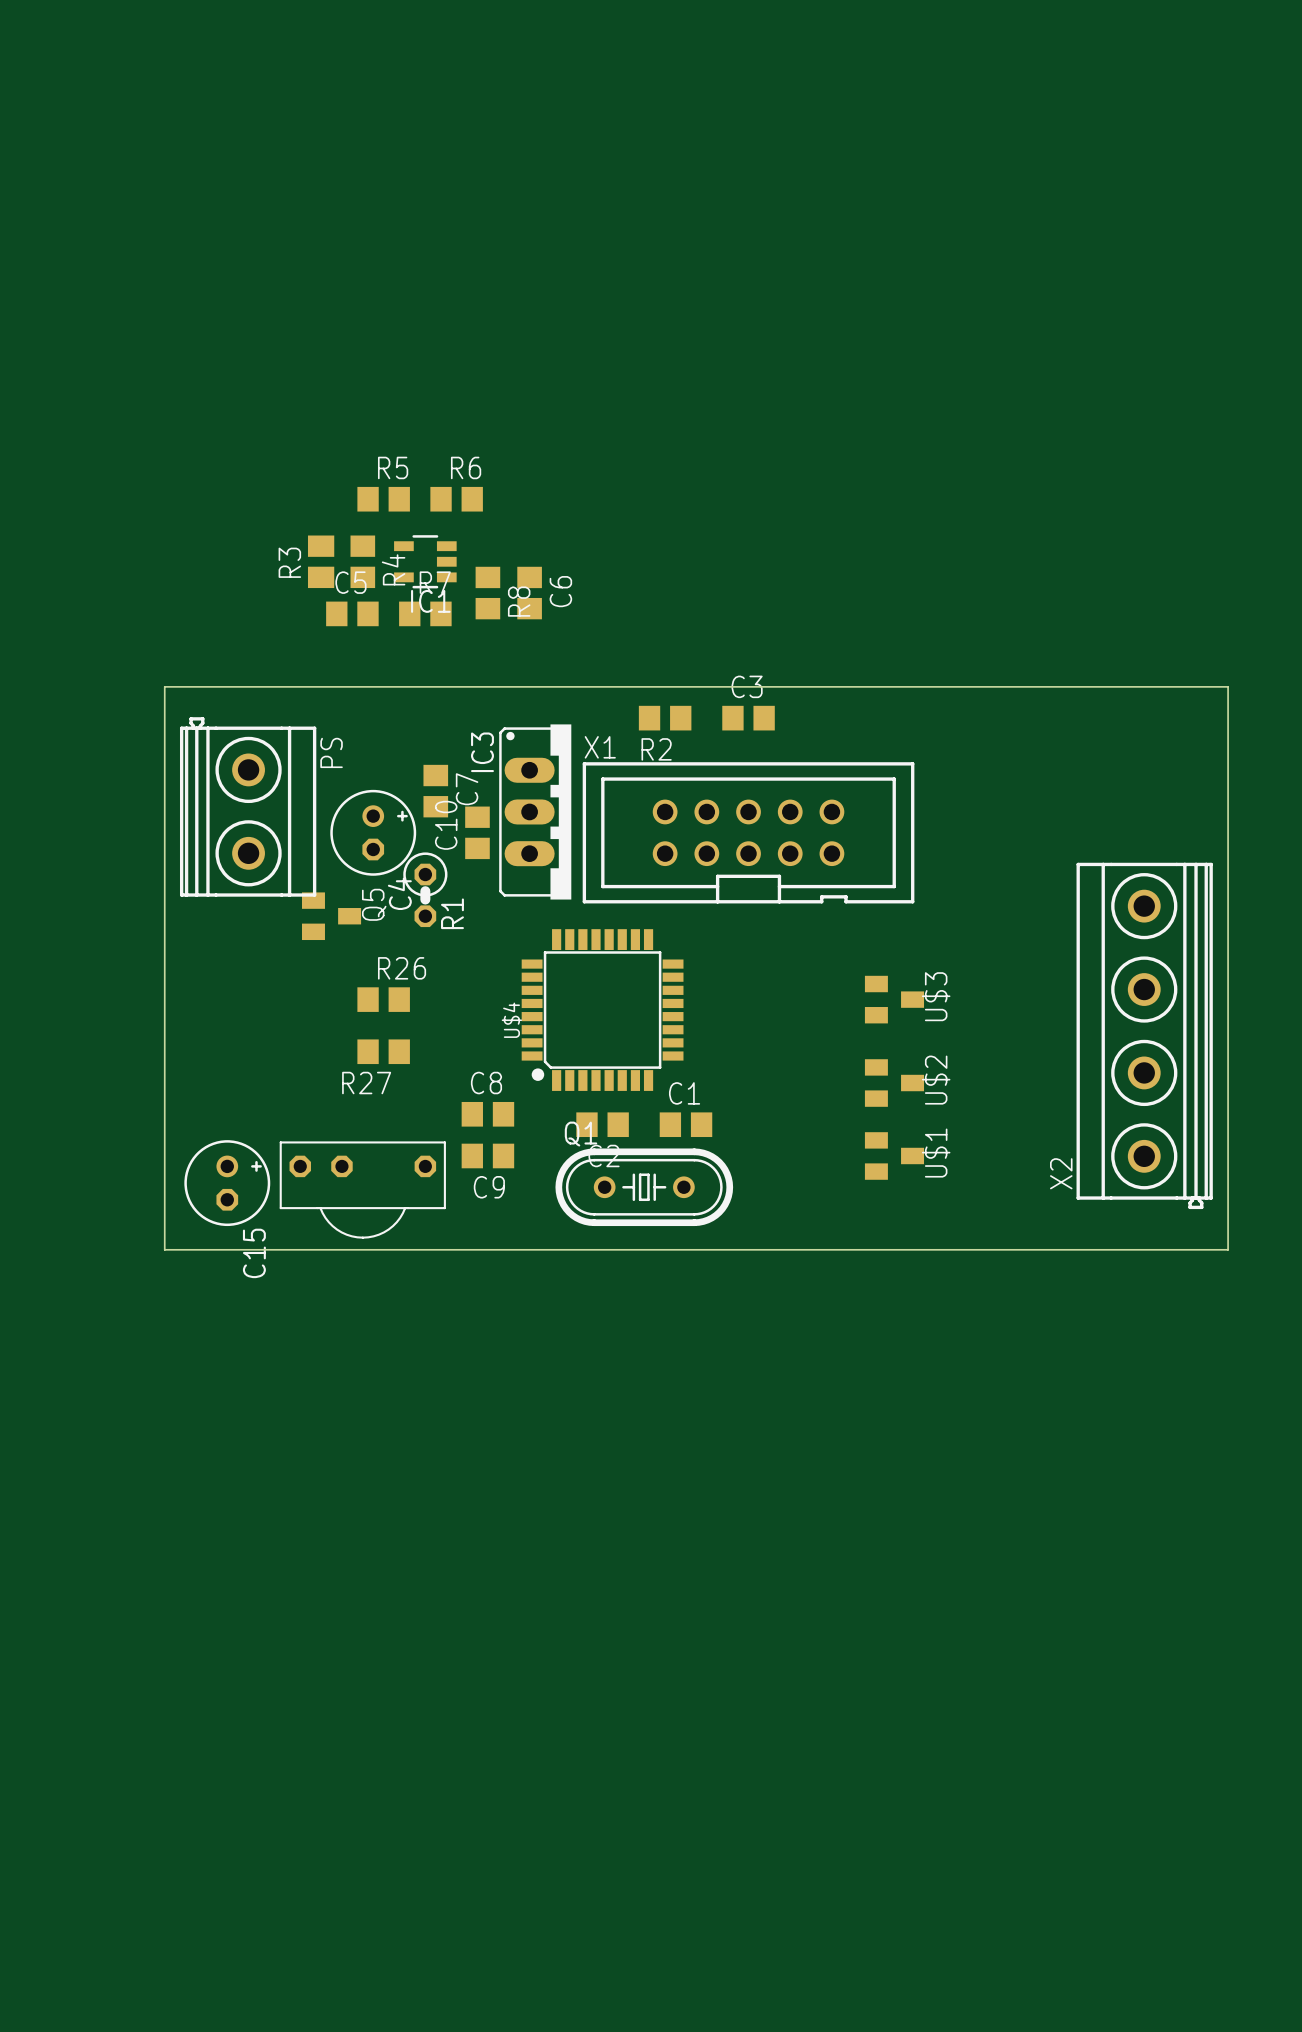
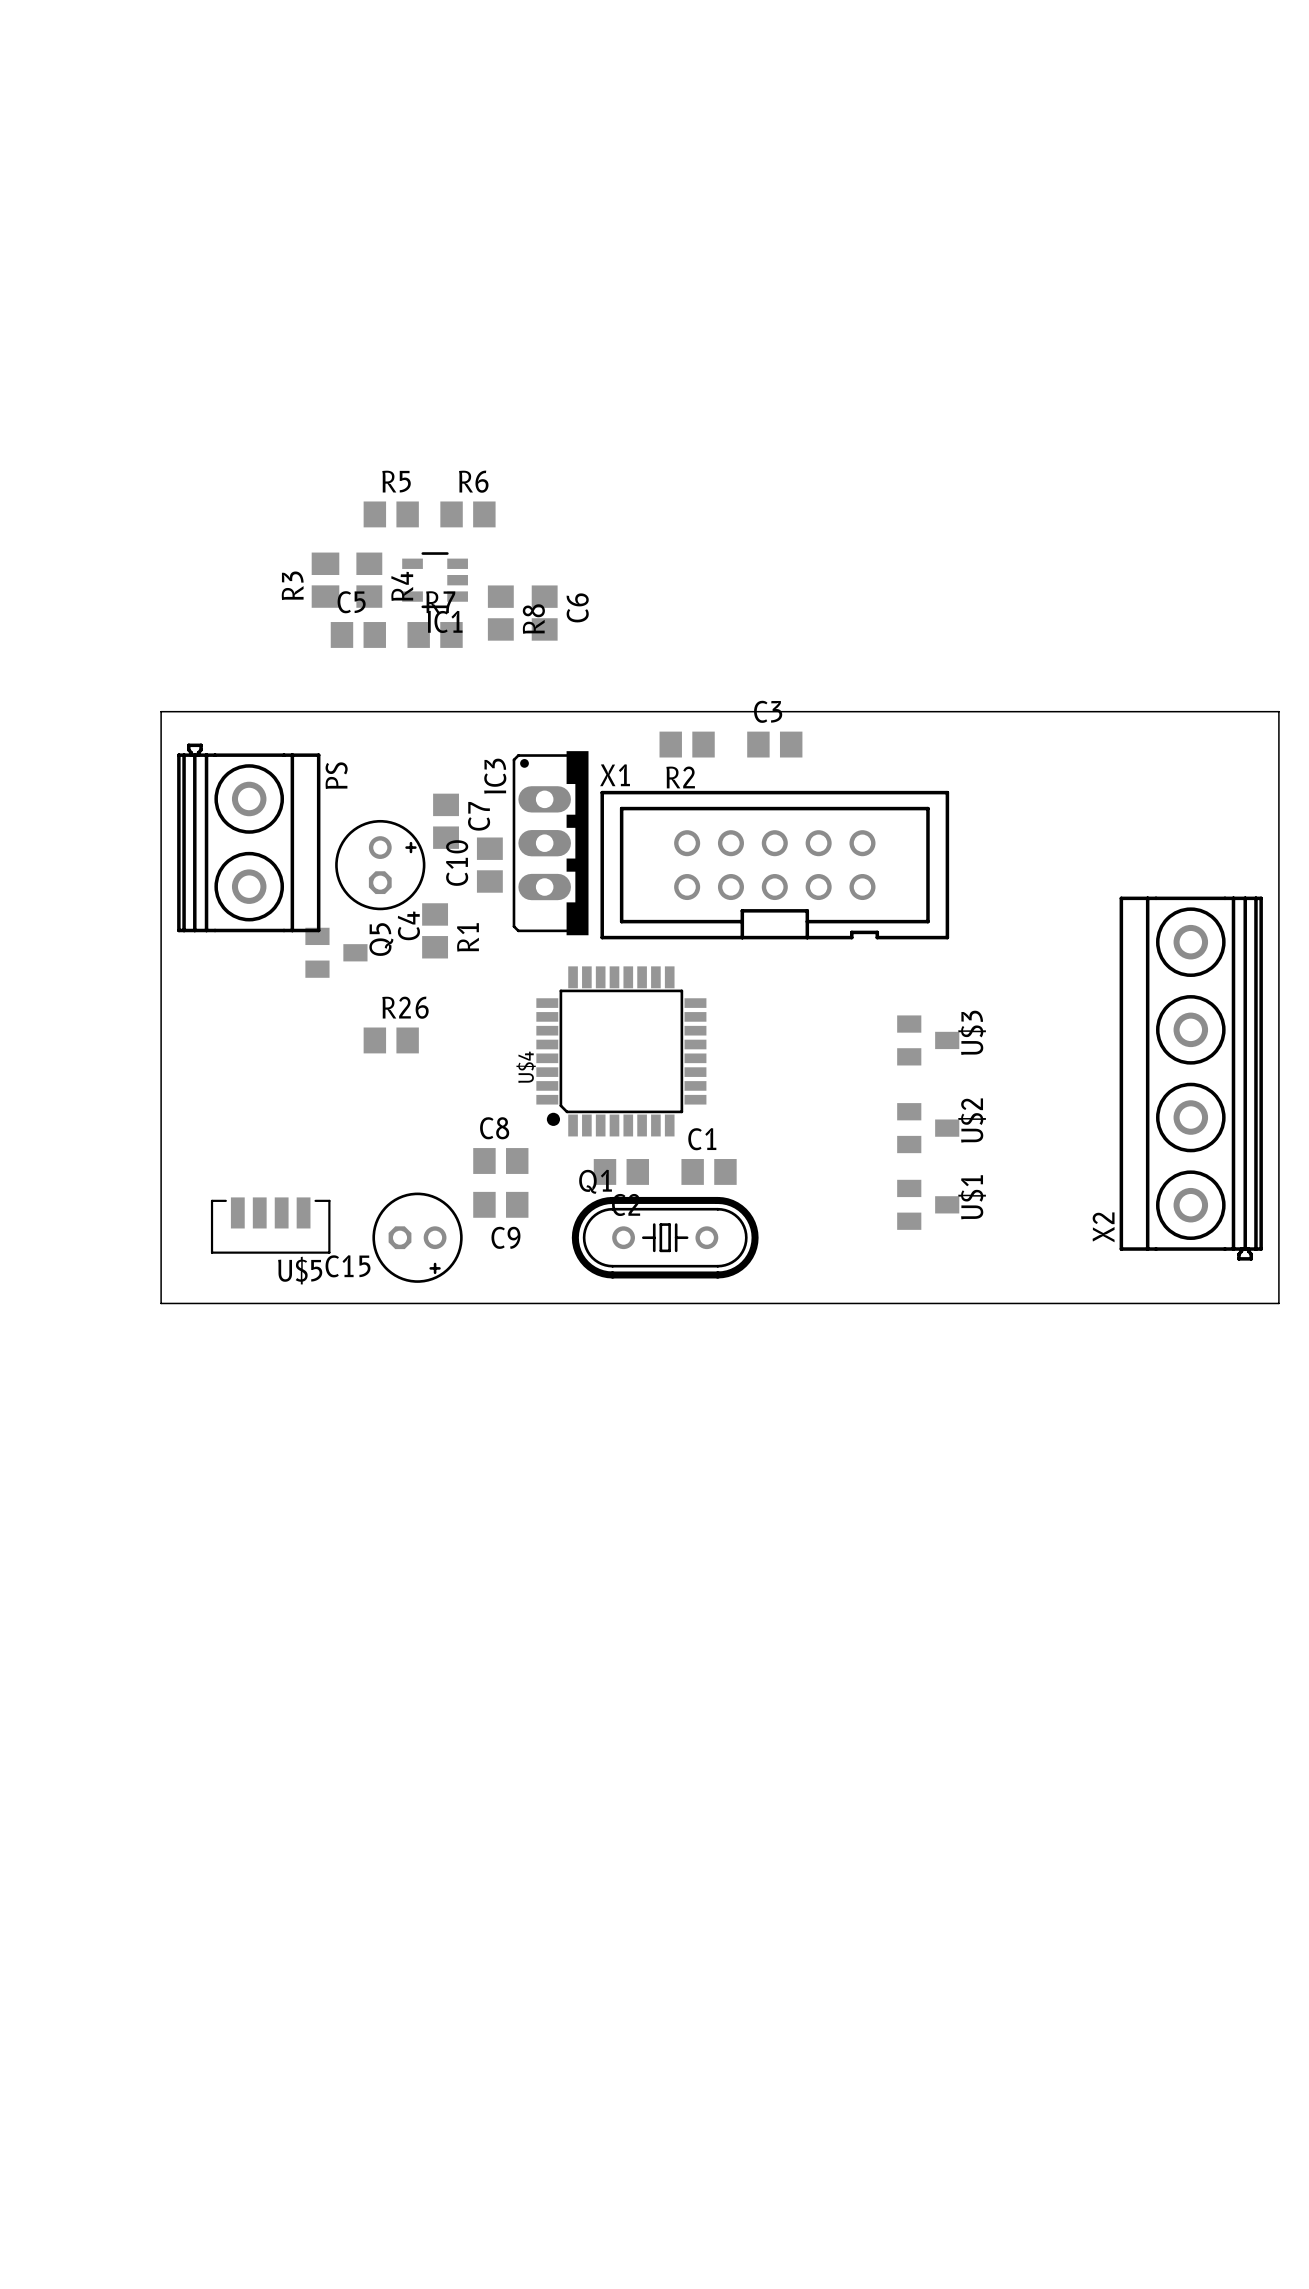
R1 footprint: [403, 852, 448, 928] -> [422, 903, 449, 959]
R27: (383, 1051) -> none
U$5: none -> (270, 1225)
C15 rotation: 0° (227, 1183) -> 90° clockwise (417, 1237)
C15 position: (227, 1183) -> (417, 1237)
part: (362, 1190) -> none

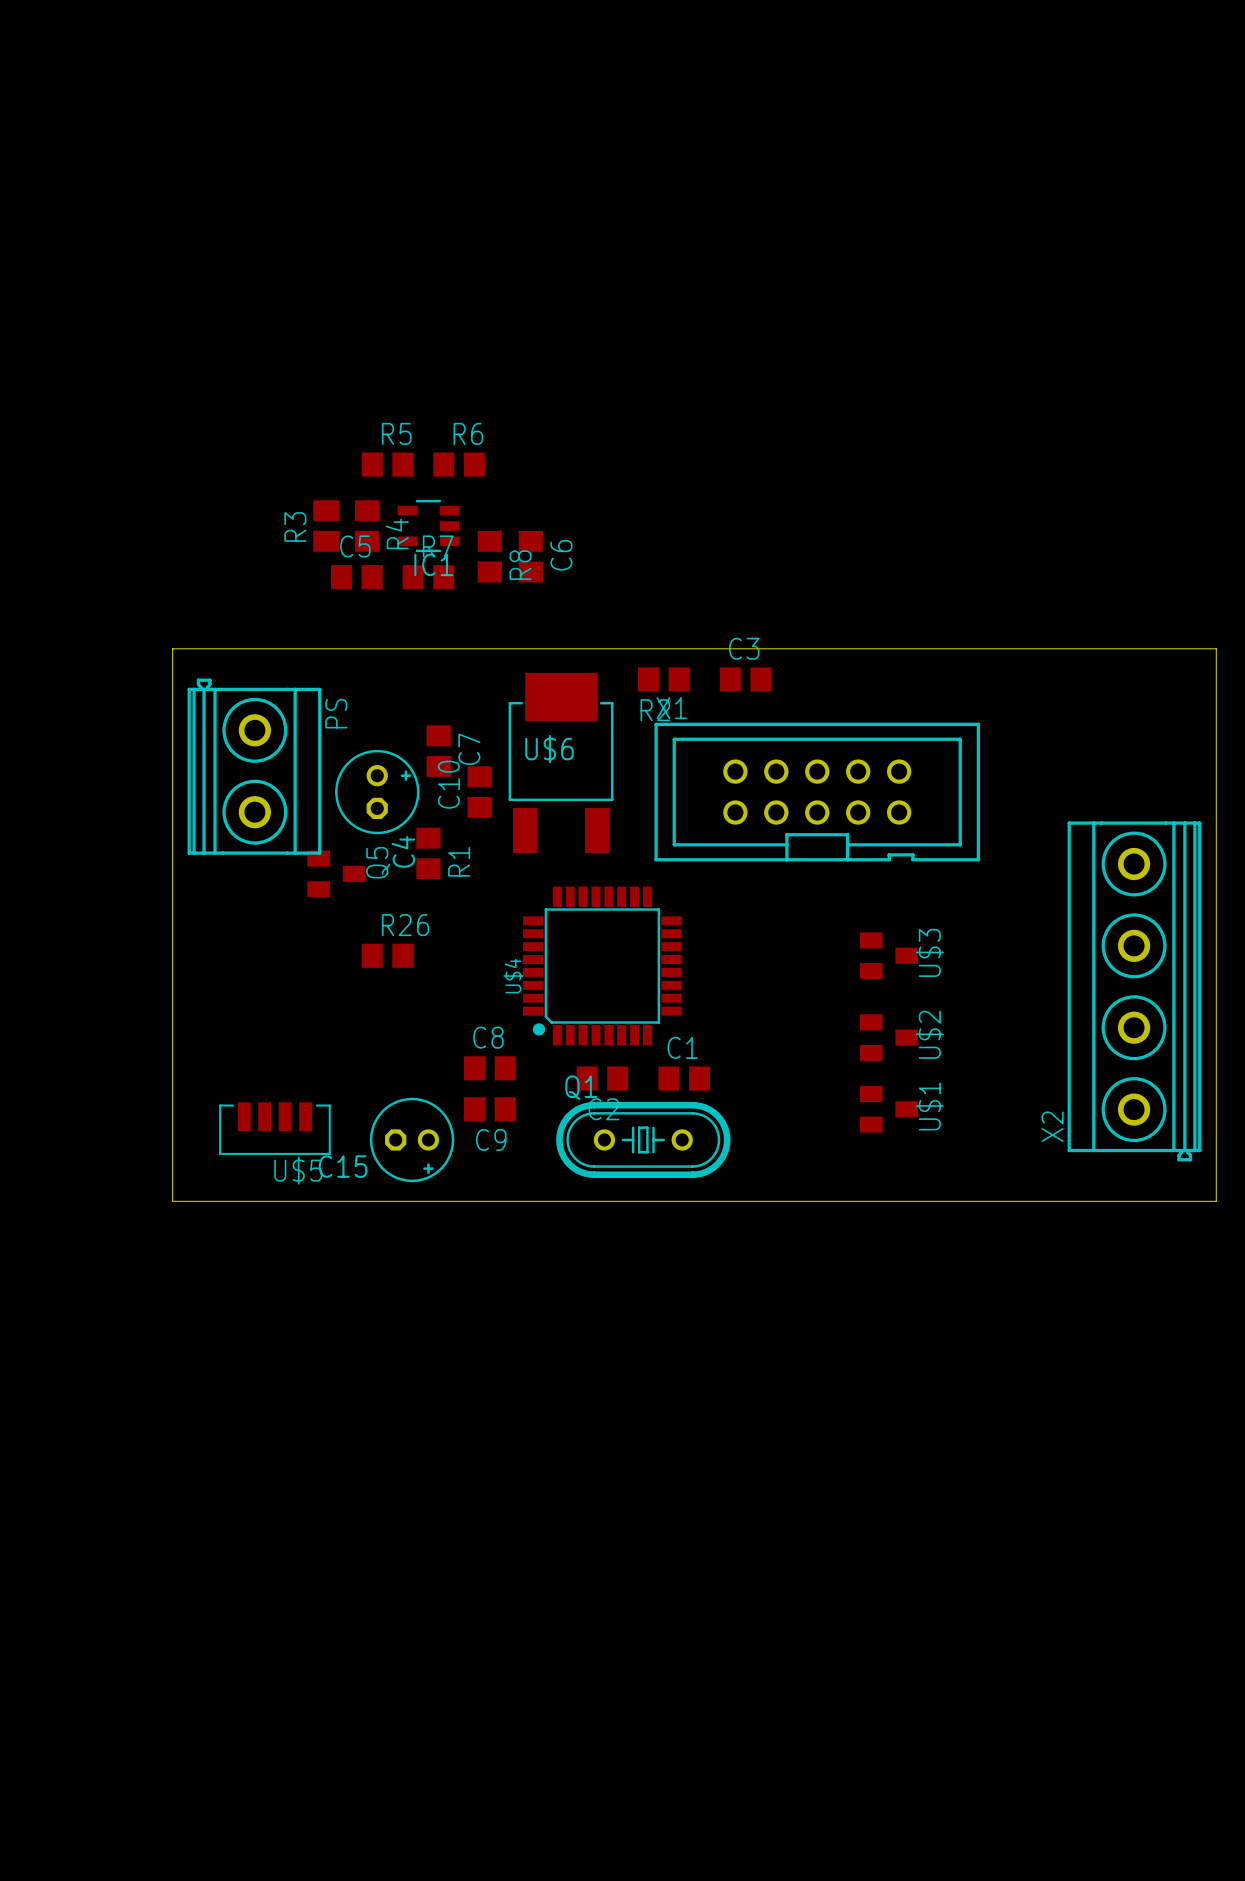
U$6: none -> (561, 763)
IC3: (550, 843) -> none
X1 position: (774, 865) -> (817, 792)

